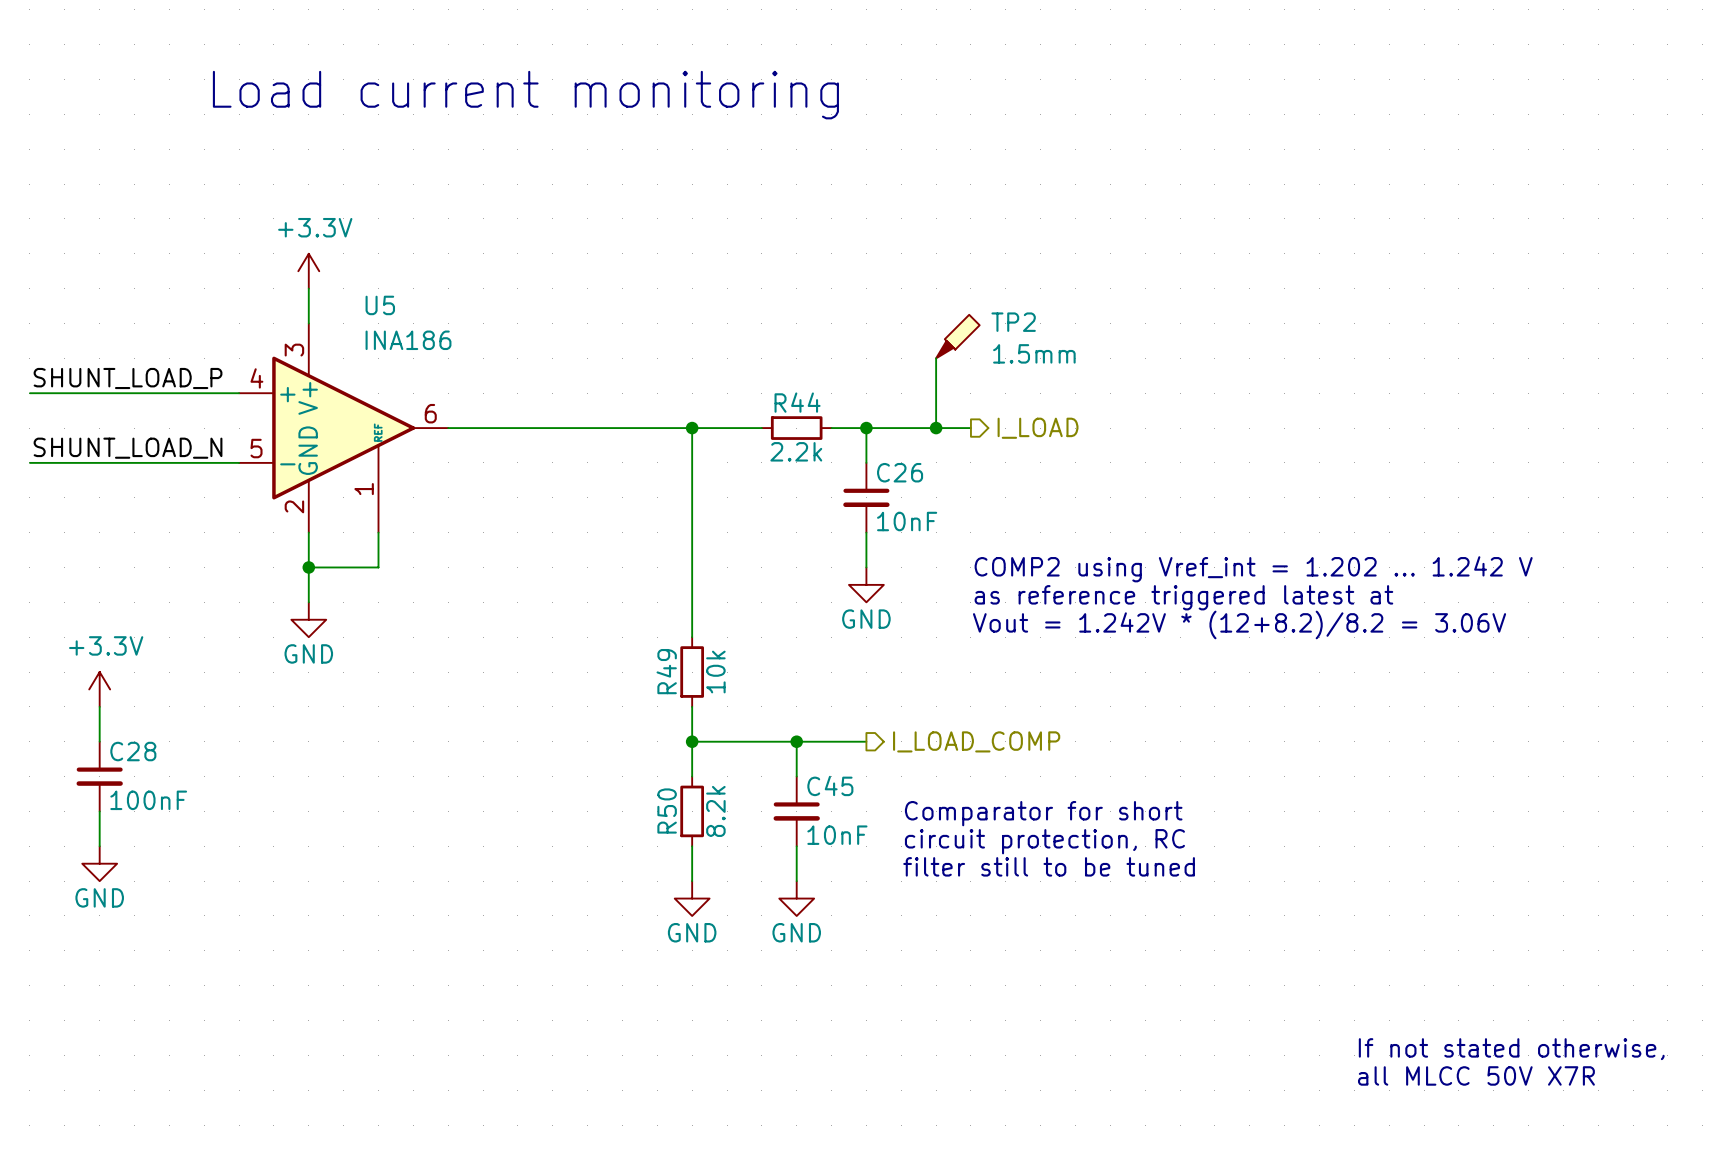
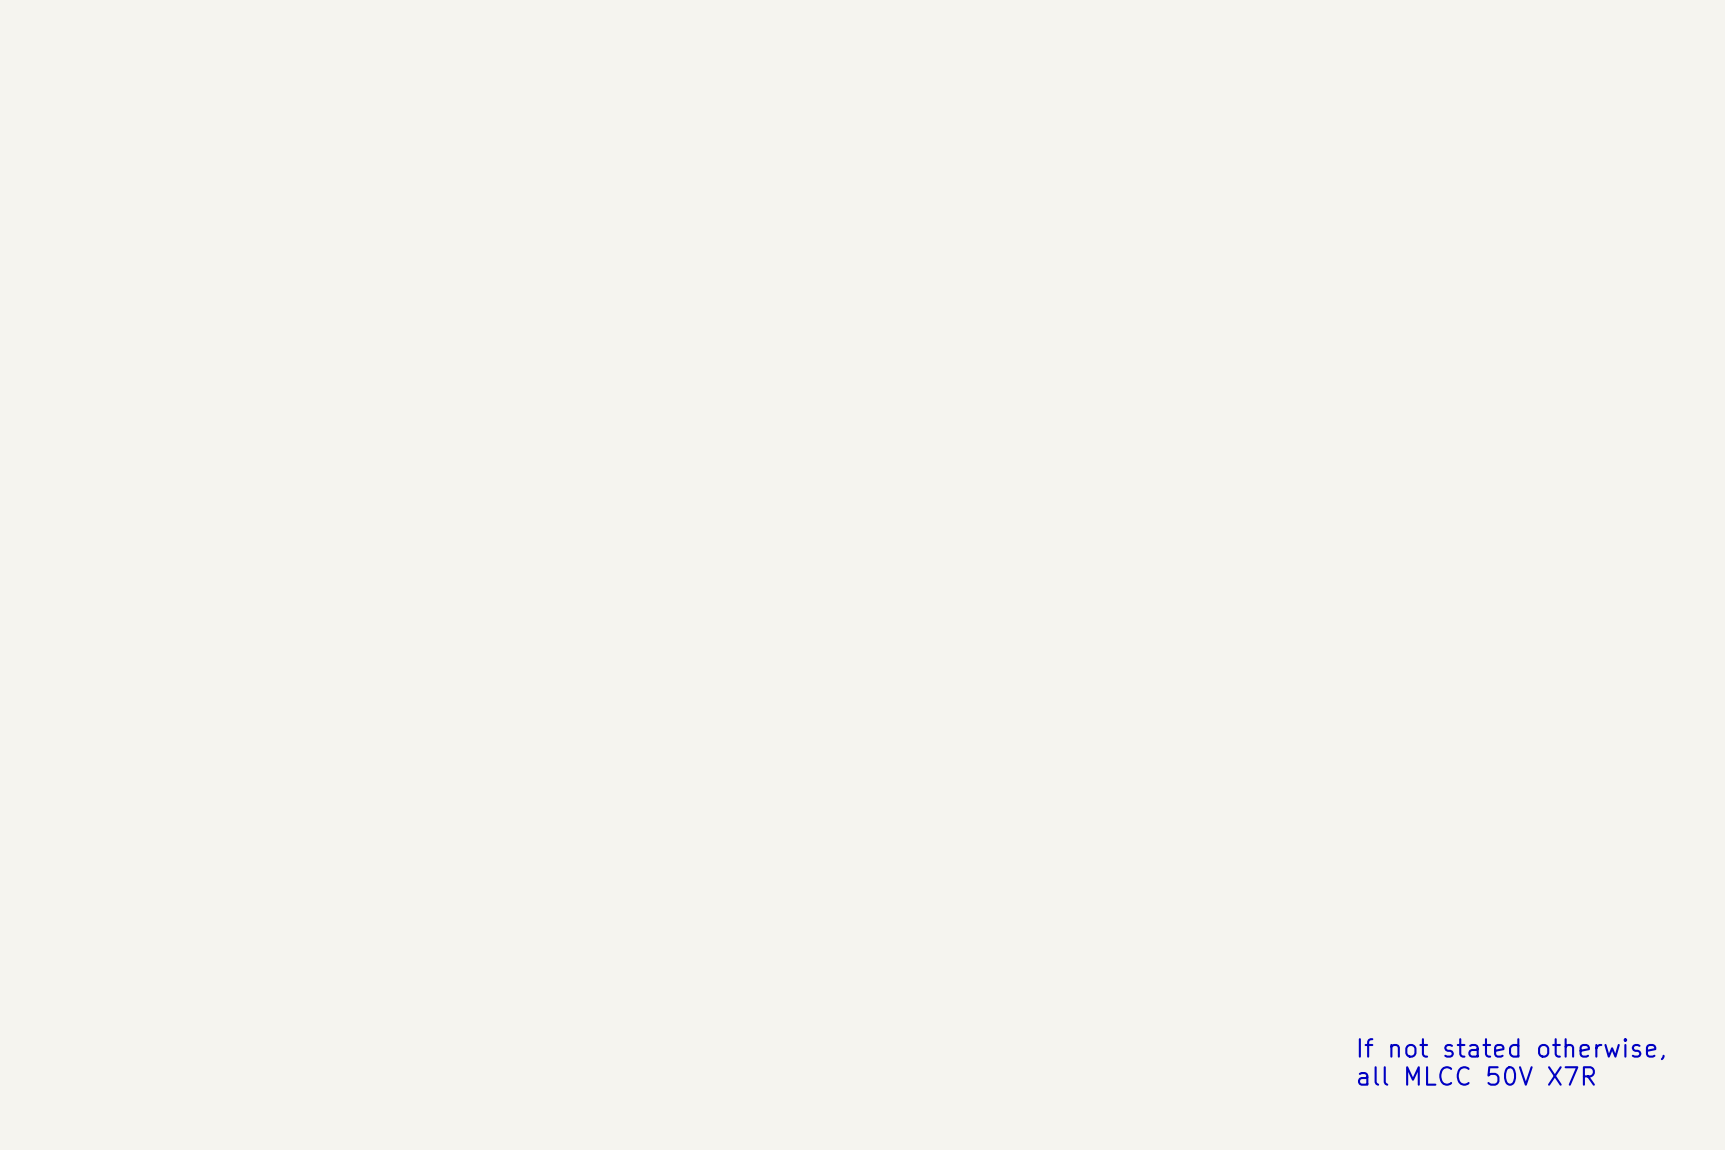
text: Load current monitoring (525, 95) -> none
power symbol: +3.3V (308, 271) -> none
wire: (308, 288) (308, 323) -> none
TP2: 1.5mm (957, 336) -> none
wire: (936, 358) (936, 428) -> none
label: SHUNT_LOAD_P (128, 378) -> none
wire: (29, 393) (239, 393) -> none
U5: INA186 (343, 428) -> none
wire: (448, 428) (761, 428) -> none
wire: (692, 428) (692, 637) -> none
junction: (692, 428) -> none
R44: 2.2k (796, 428) -> none
wire: (831, 428) (970, 428) -> none
wire: (866, 428) (866, 462) -> none
junction: (866, 428) -> none
junction: (936, 428) -> none
hierarchical label: I_LOAD (1038, 428) -> none
label: SHUNT_LOAD_N (128, 448) -> none
wire: (29, 462) (239, 462) -> none
C26: 10nF (866, 497) -> none
wire: (308, 532) (308, 602) -> none
wire: (378, 532) (378, 567) (308, 567) -> none
wire: (866, 532) (866, 567) -> none
junction: (308, 567) -> none
text: COMP2 using Vref_int = 1.202 ... 1.242 V (1253, 569) -> none
power symbol: GND (866, 584) -> none
text: as reference triggered latest at (1183, 597) -> none
power symbol: GND (308, 619) -> none
text: Vout = 1.242V * (12+8.2)/8.2 = 3.06V (1239, 624) -> none
R49: 10k (692, 672) -> none
power symbol: +3.3V (99, 689) -> none
wire: (99, 706) (99, 741) -> none
wire: (692, 706) (692, 776) -> none
wire: (692, 741) (866, 741) -> none
junction: (692, 741) -> none
wire: (796, 741) (796, 776) -> none
junction: (796, 741) -> none
hierarchical label: I_LOAD_COMP (976, 741) -> none
C28: 100nF (99, 776) -> none
wire: (99, 811) (99, 846) -> none
R50: 8.2k (692, 811) -> none
C45: 10nF (796, 811) -> none
text: Comparator for short (1043, 813) -> none
text: circuit protection, RC (1044, 841) -> none
wire: (692, 846) (692, 881) -> none
wire: (796, 846) (796, 881) -> none
power symbol: GND (99, 863) -> none
text: filter still to be tuned (1049, 866) -> none
power symbol: GND (692, 898) -> none
power symbol: GND (796, 898) -> none

